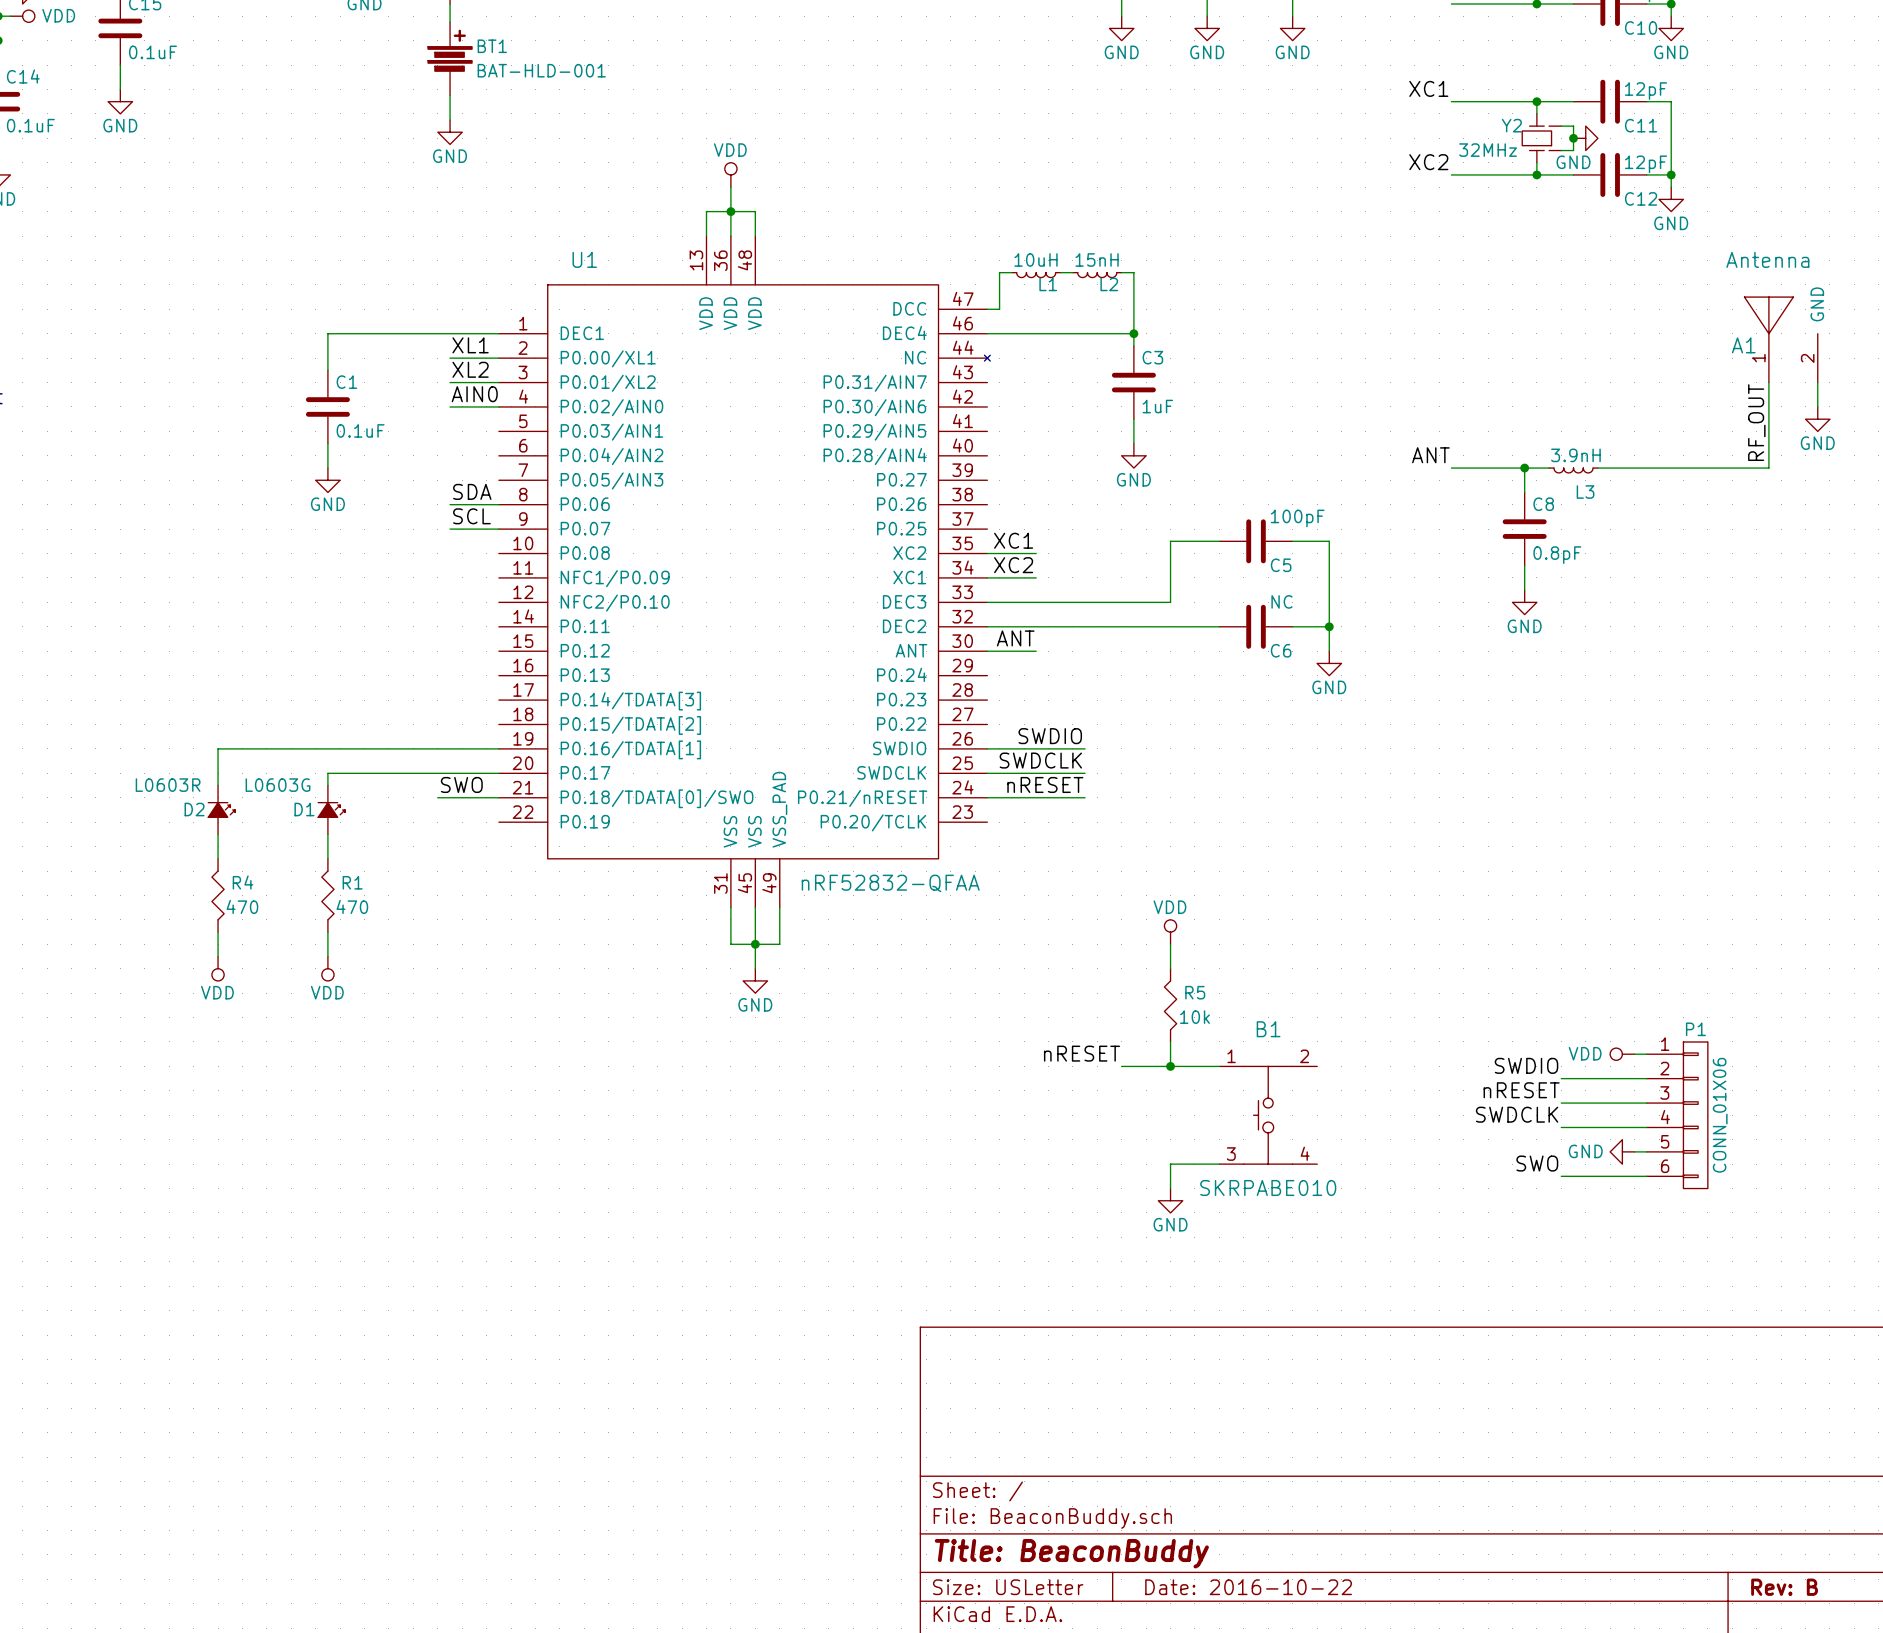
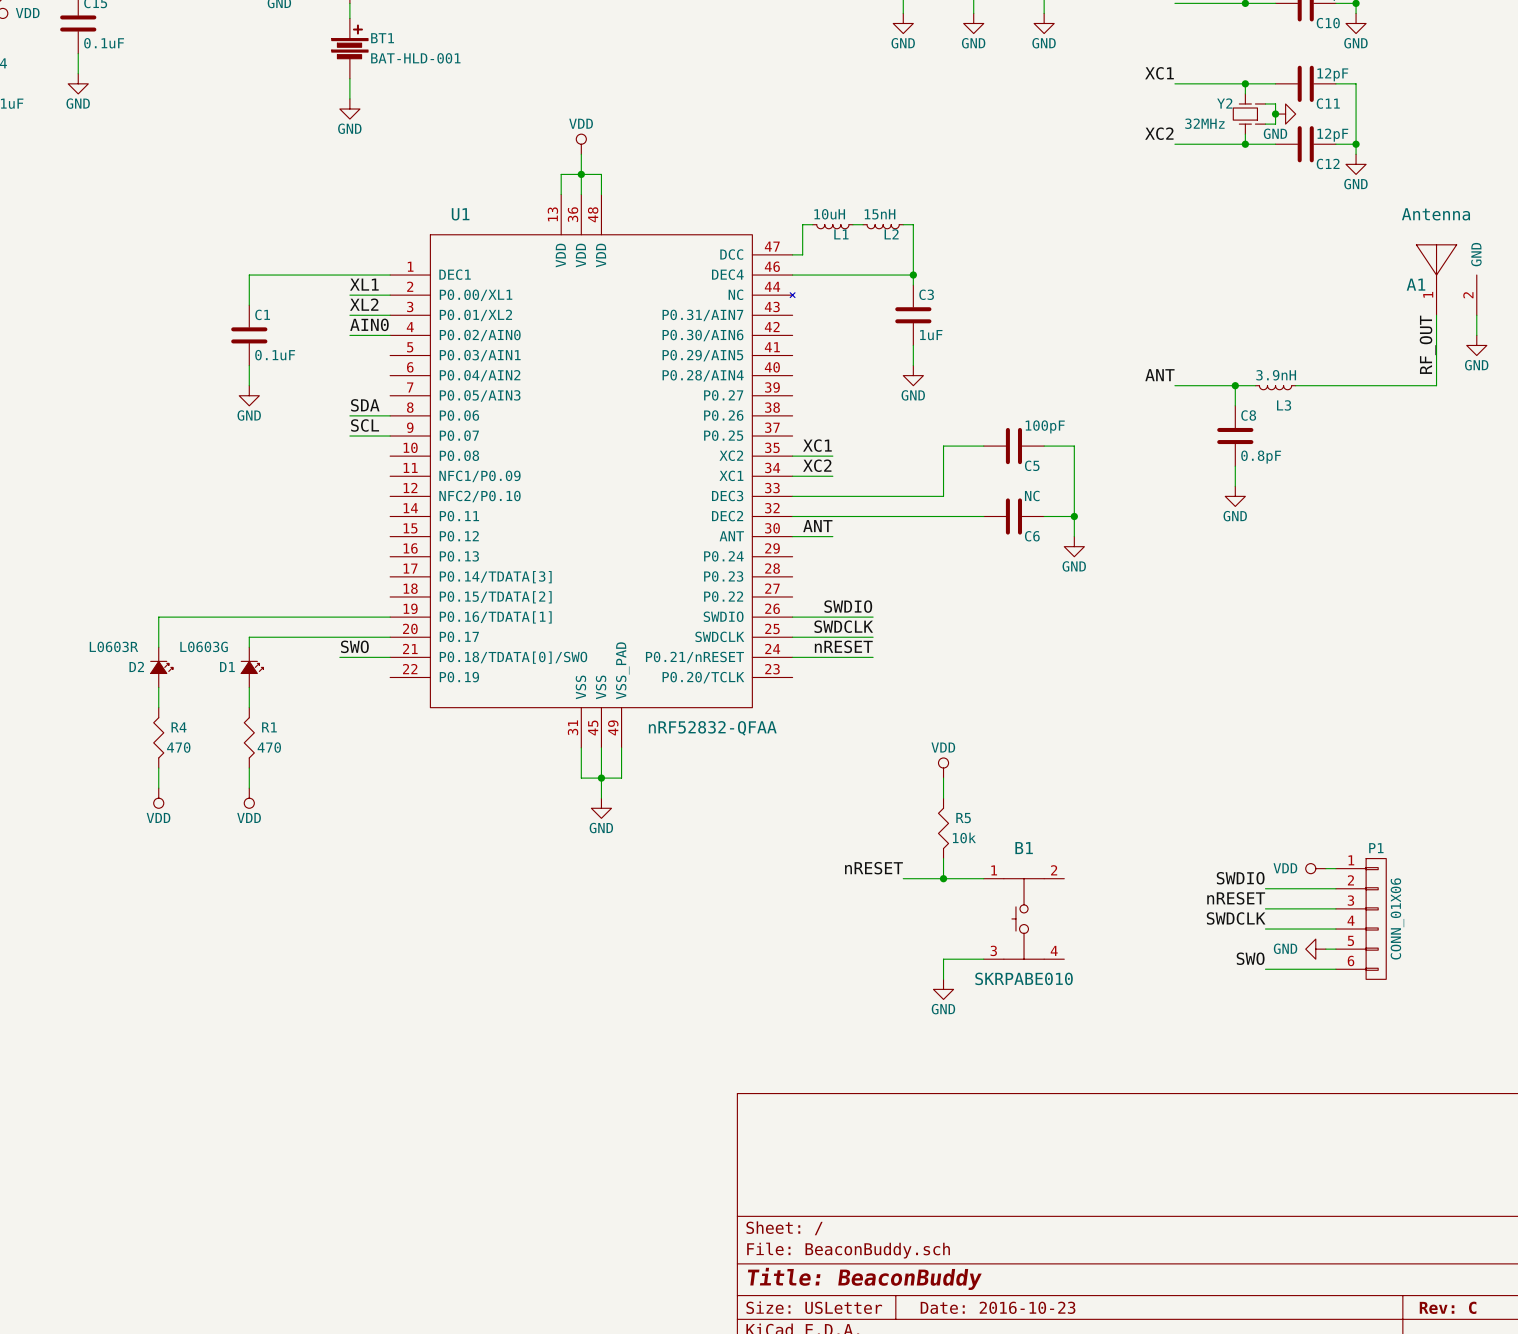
title block: Date: 2016-10-22 (1248, 1587) -> Date: 2016-10-23 (998, 1307)
title block: Rev: B (1784, 1587) -> Rev: C (1448, 1307)

